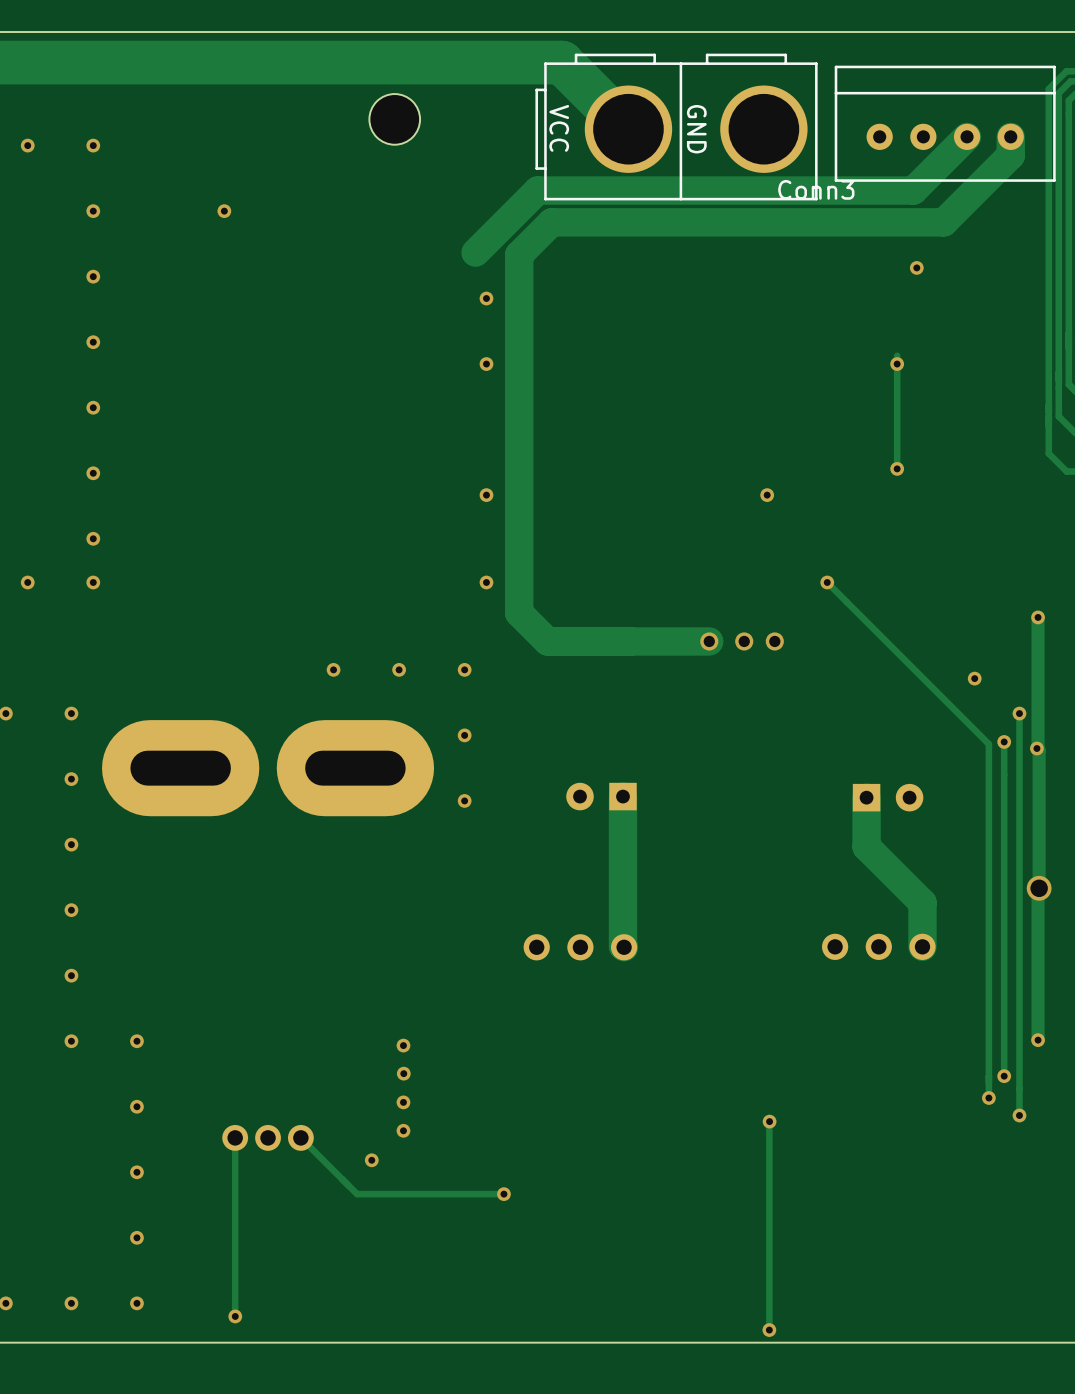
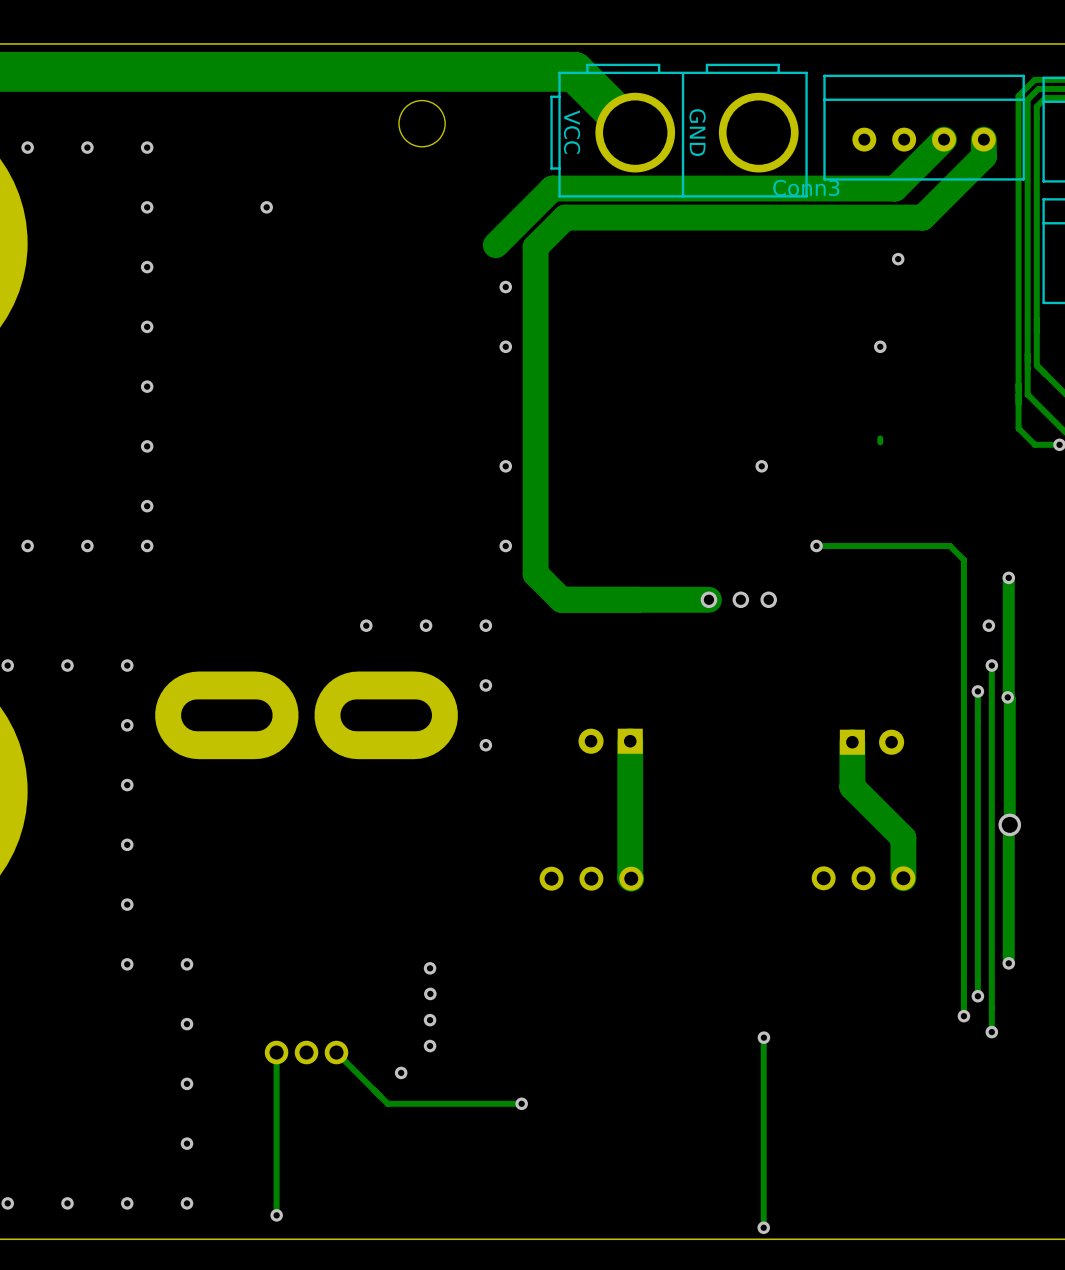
track: (897, 355) (897, 464) -> none
via: (897, 468) -> none
track: (827, 582) (988, 744) -> (816, 546) (949, 546) (963, 559) (963, 693)
via position: (974, 678) -> (988, 625)

